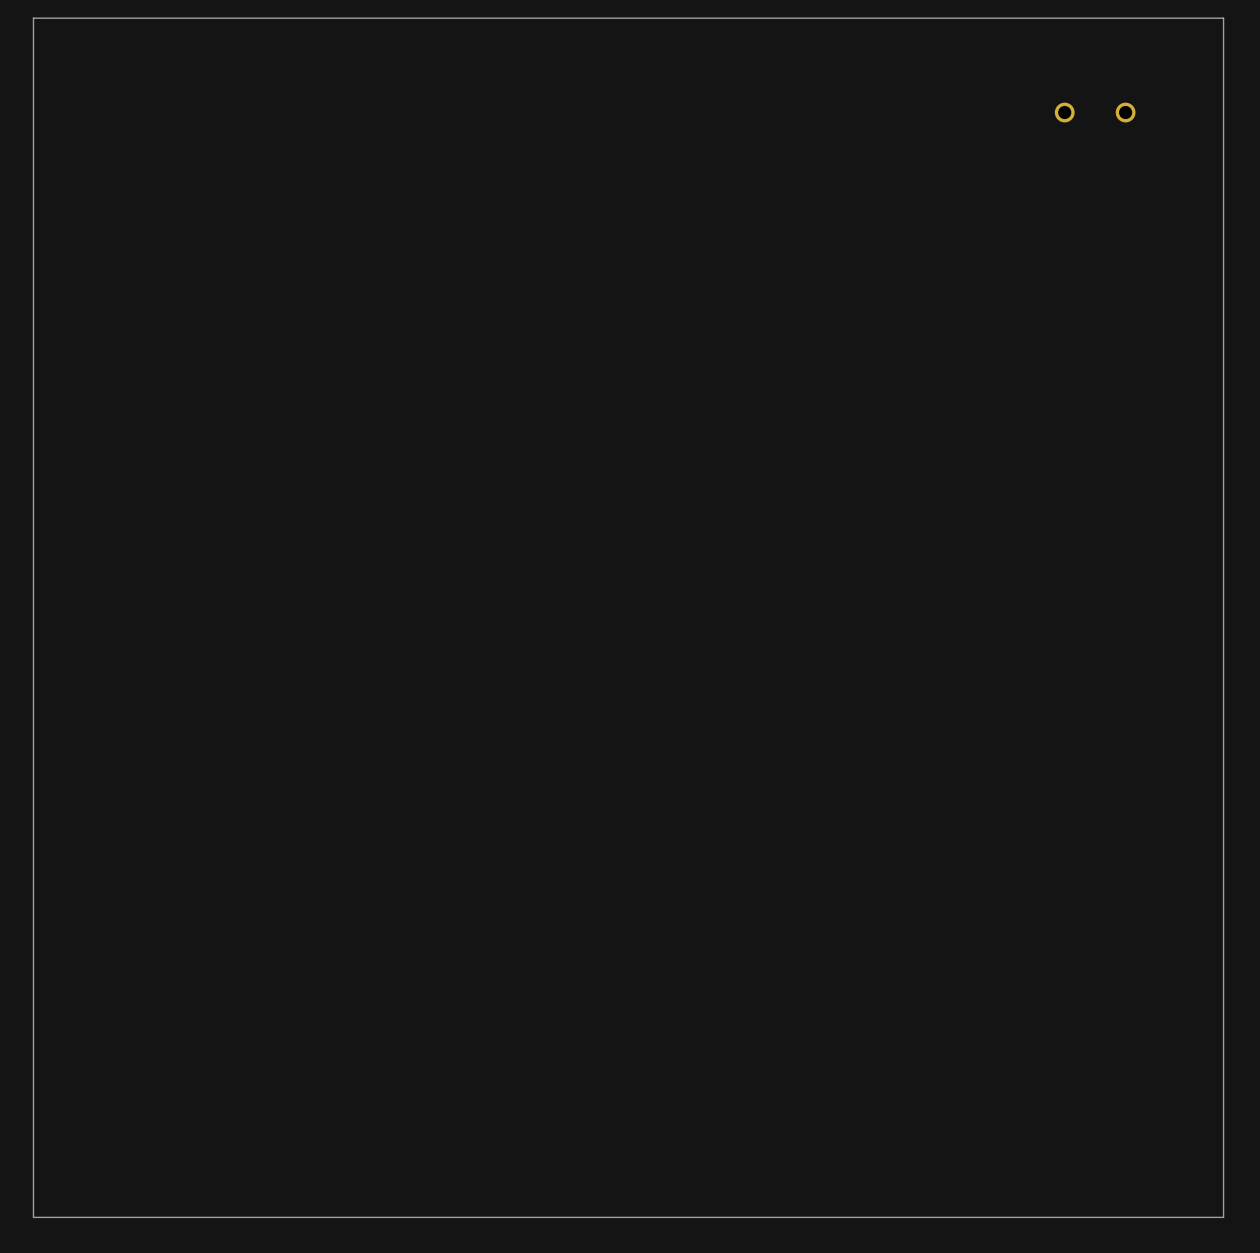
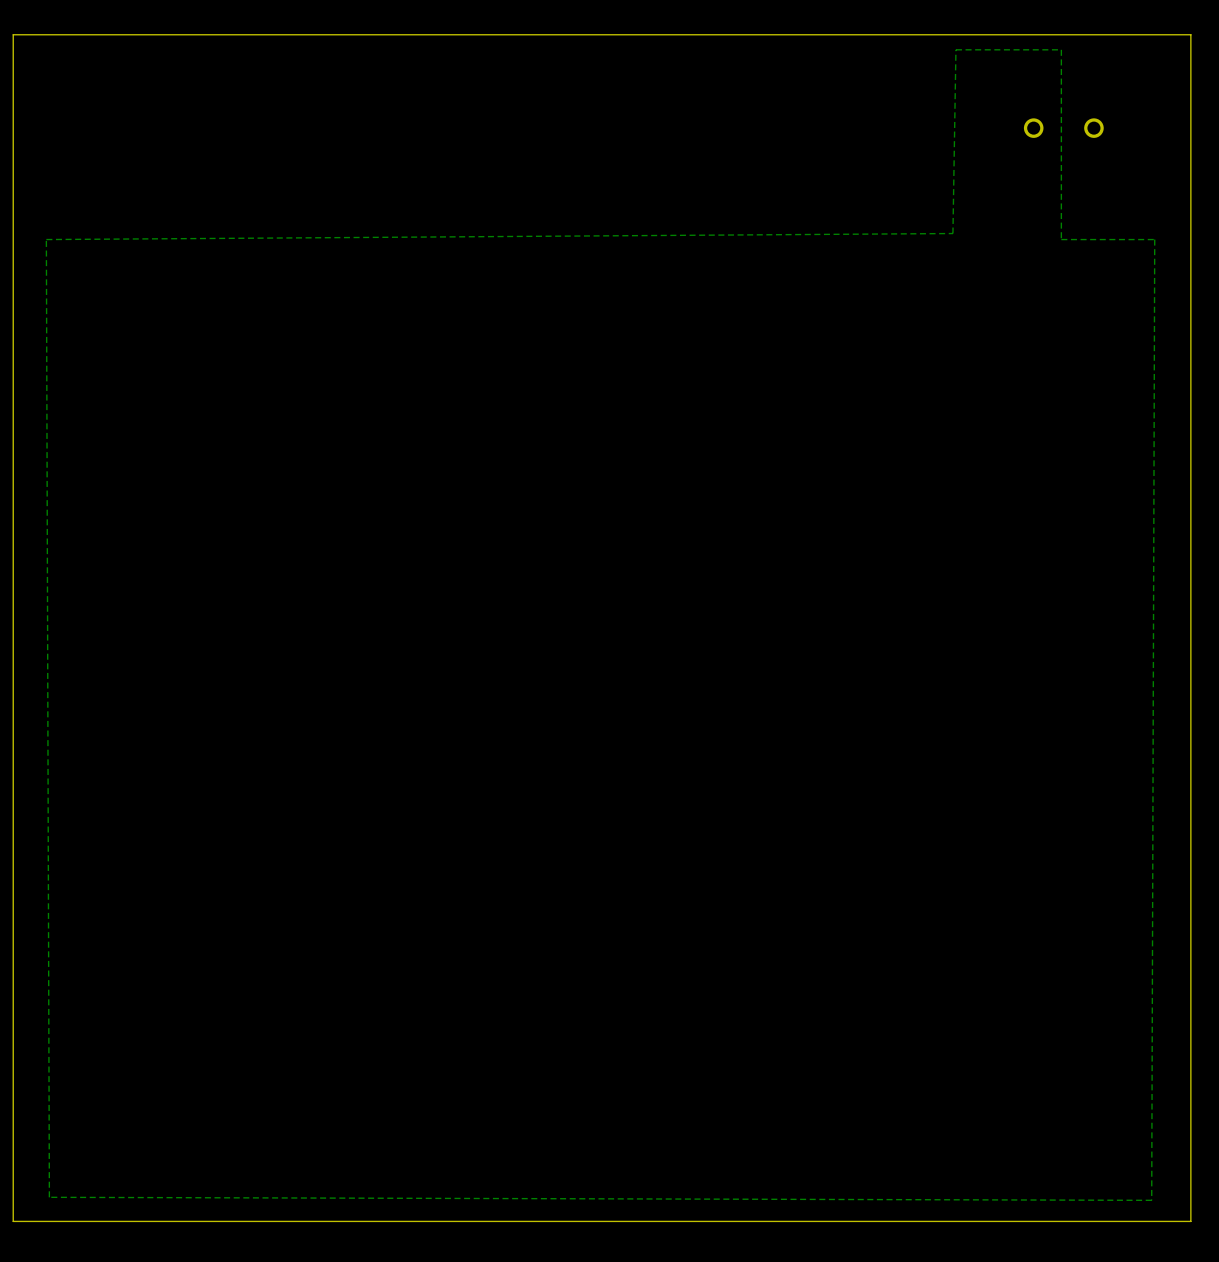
zone outline: none -> (1061, 49) (955, 49) (952, 233) (46, 239) (49, 1197) (1151, 1200) (1154, 239) (1061, 239) (1061, 49)

